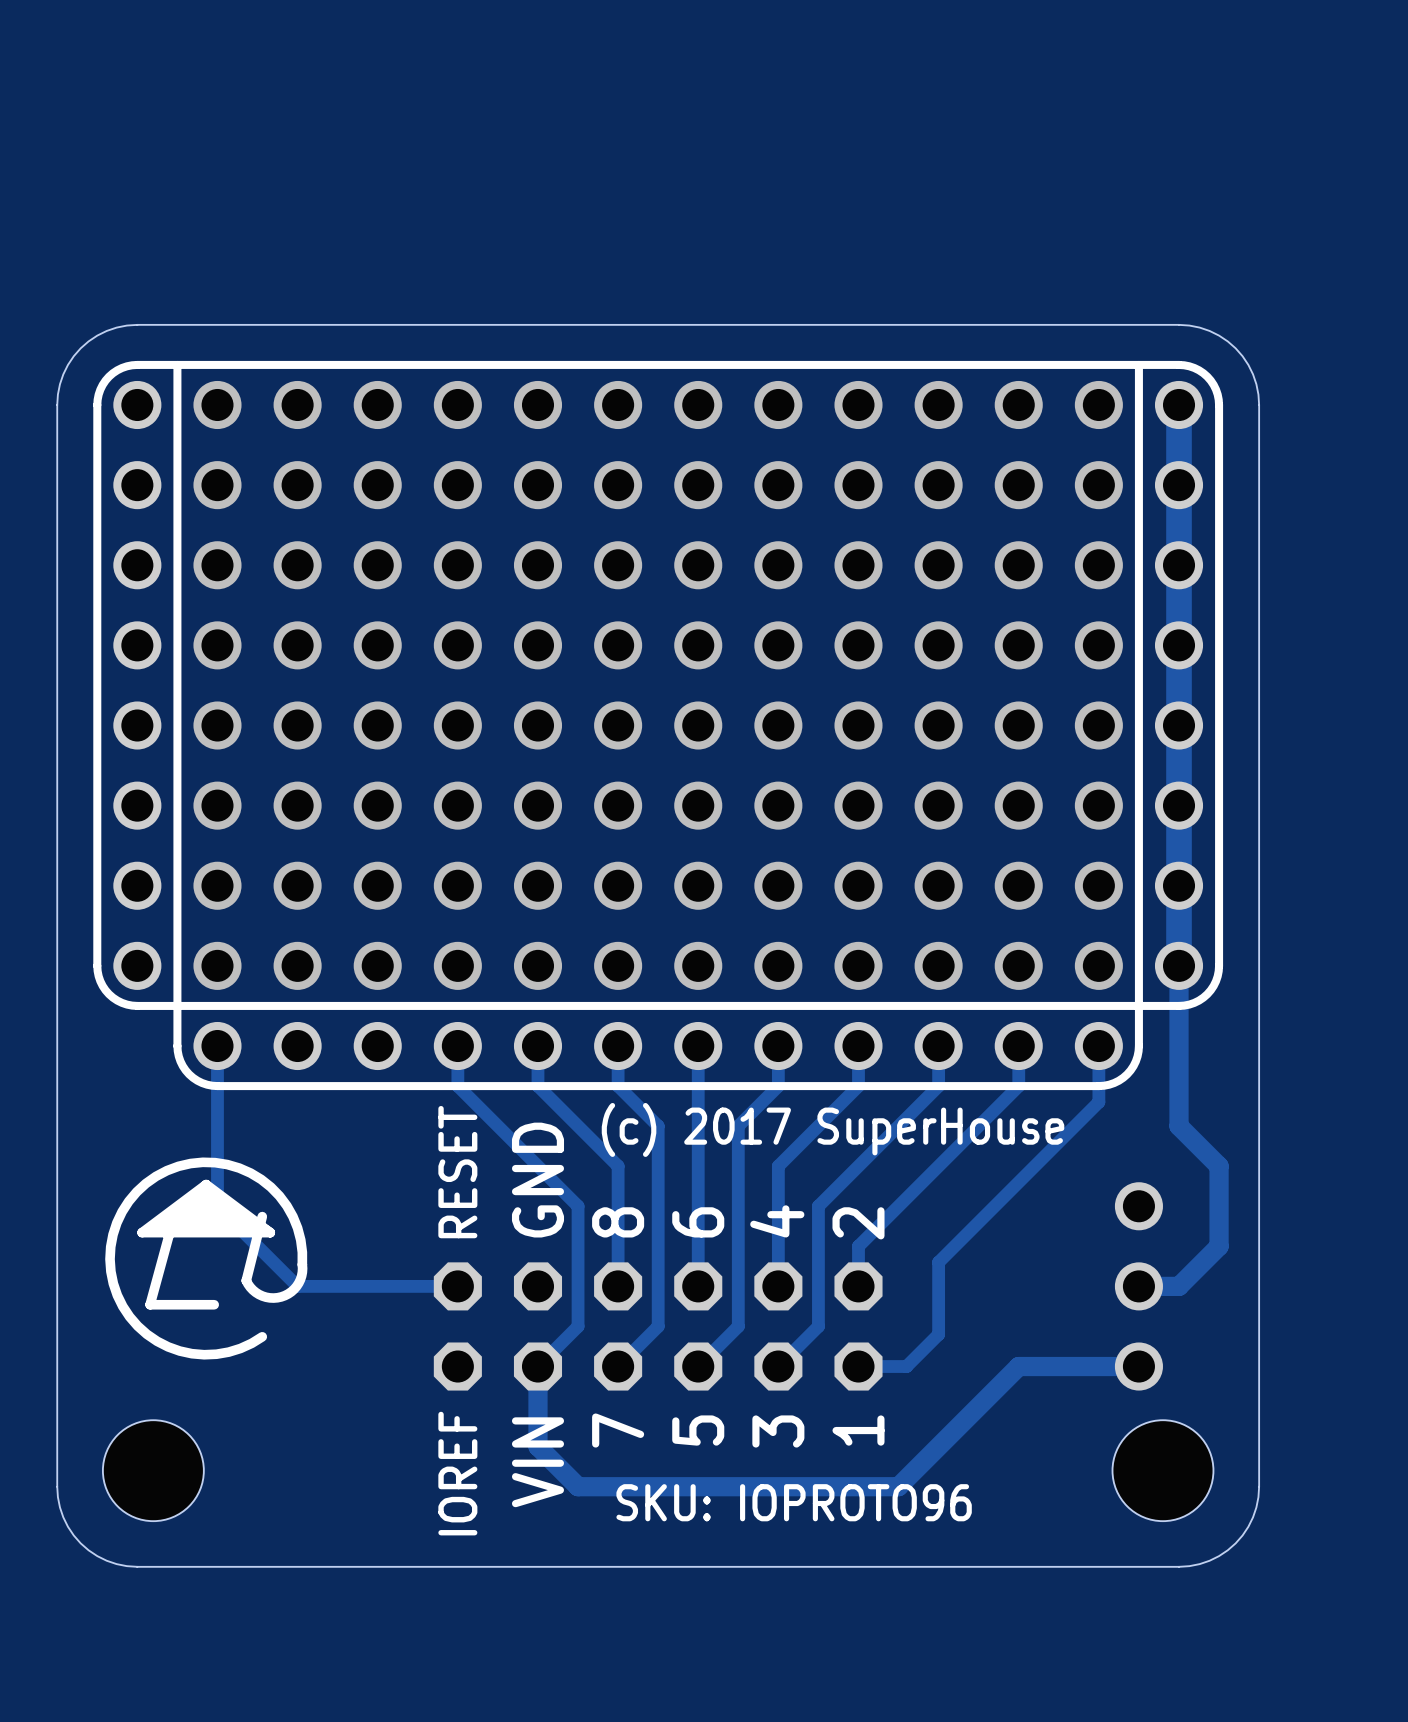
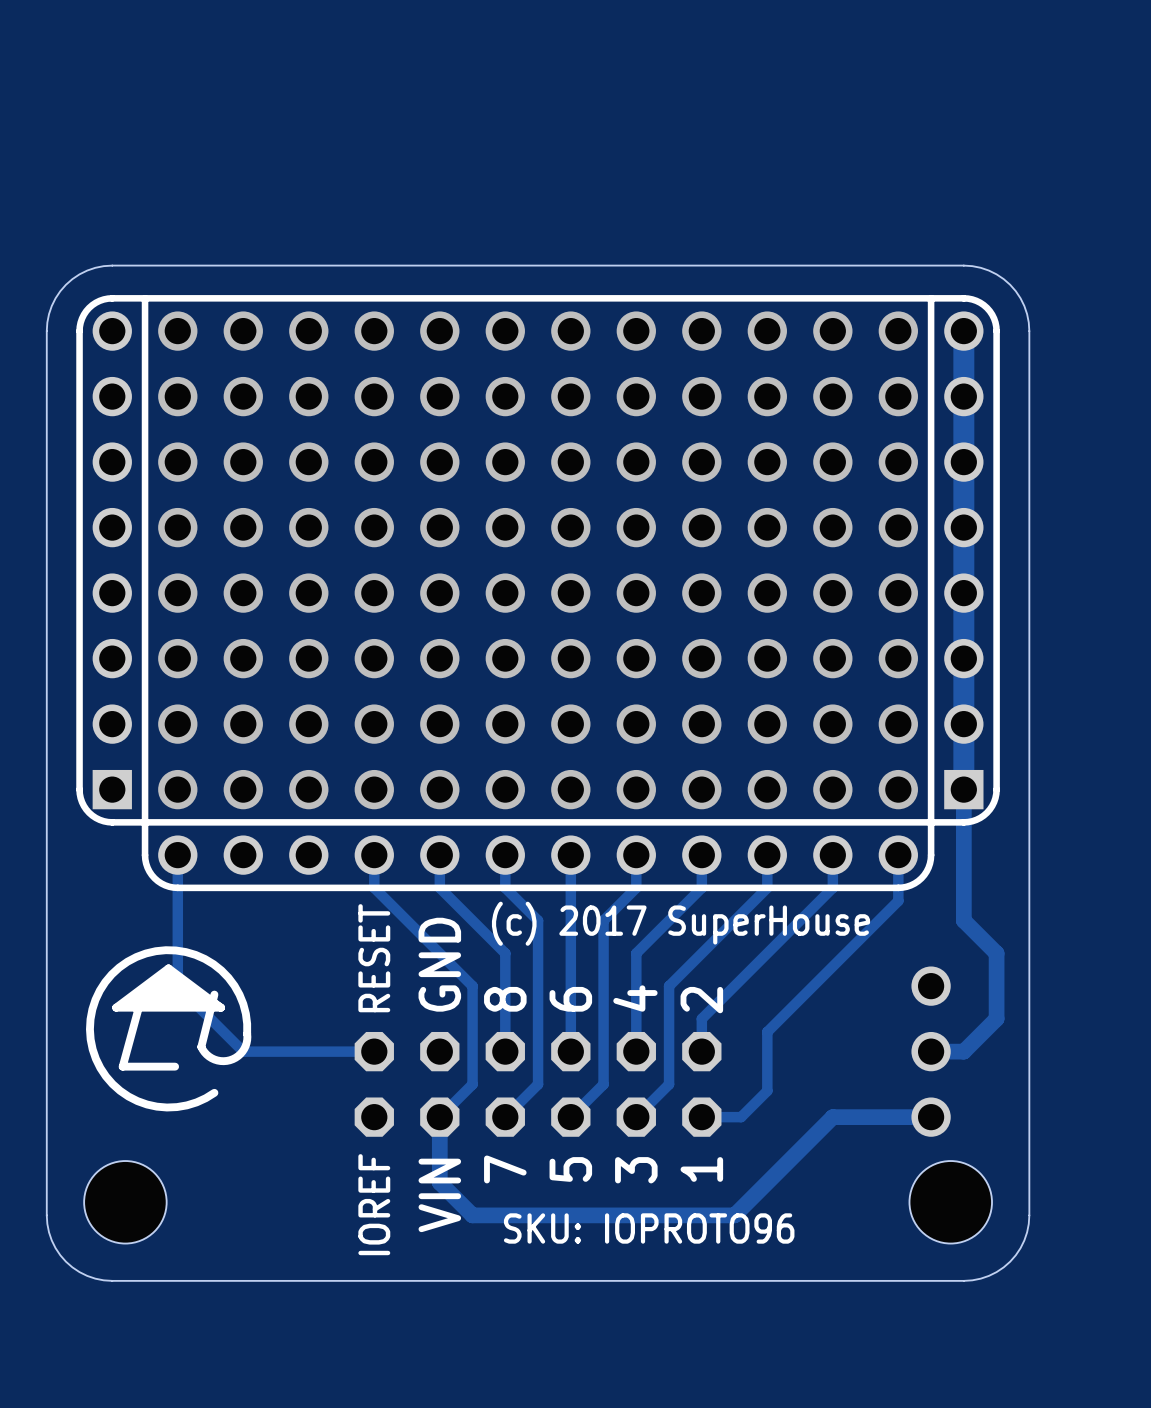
part footprint: [113, 380, 162, 990] -> [92, 311, 132, 810]
part footprint: [1154, 380, 1204, 990] -> [944, 311, 984, 810]

